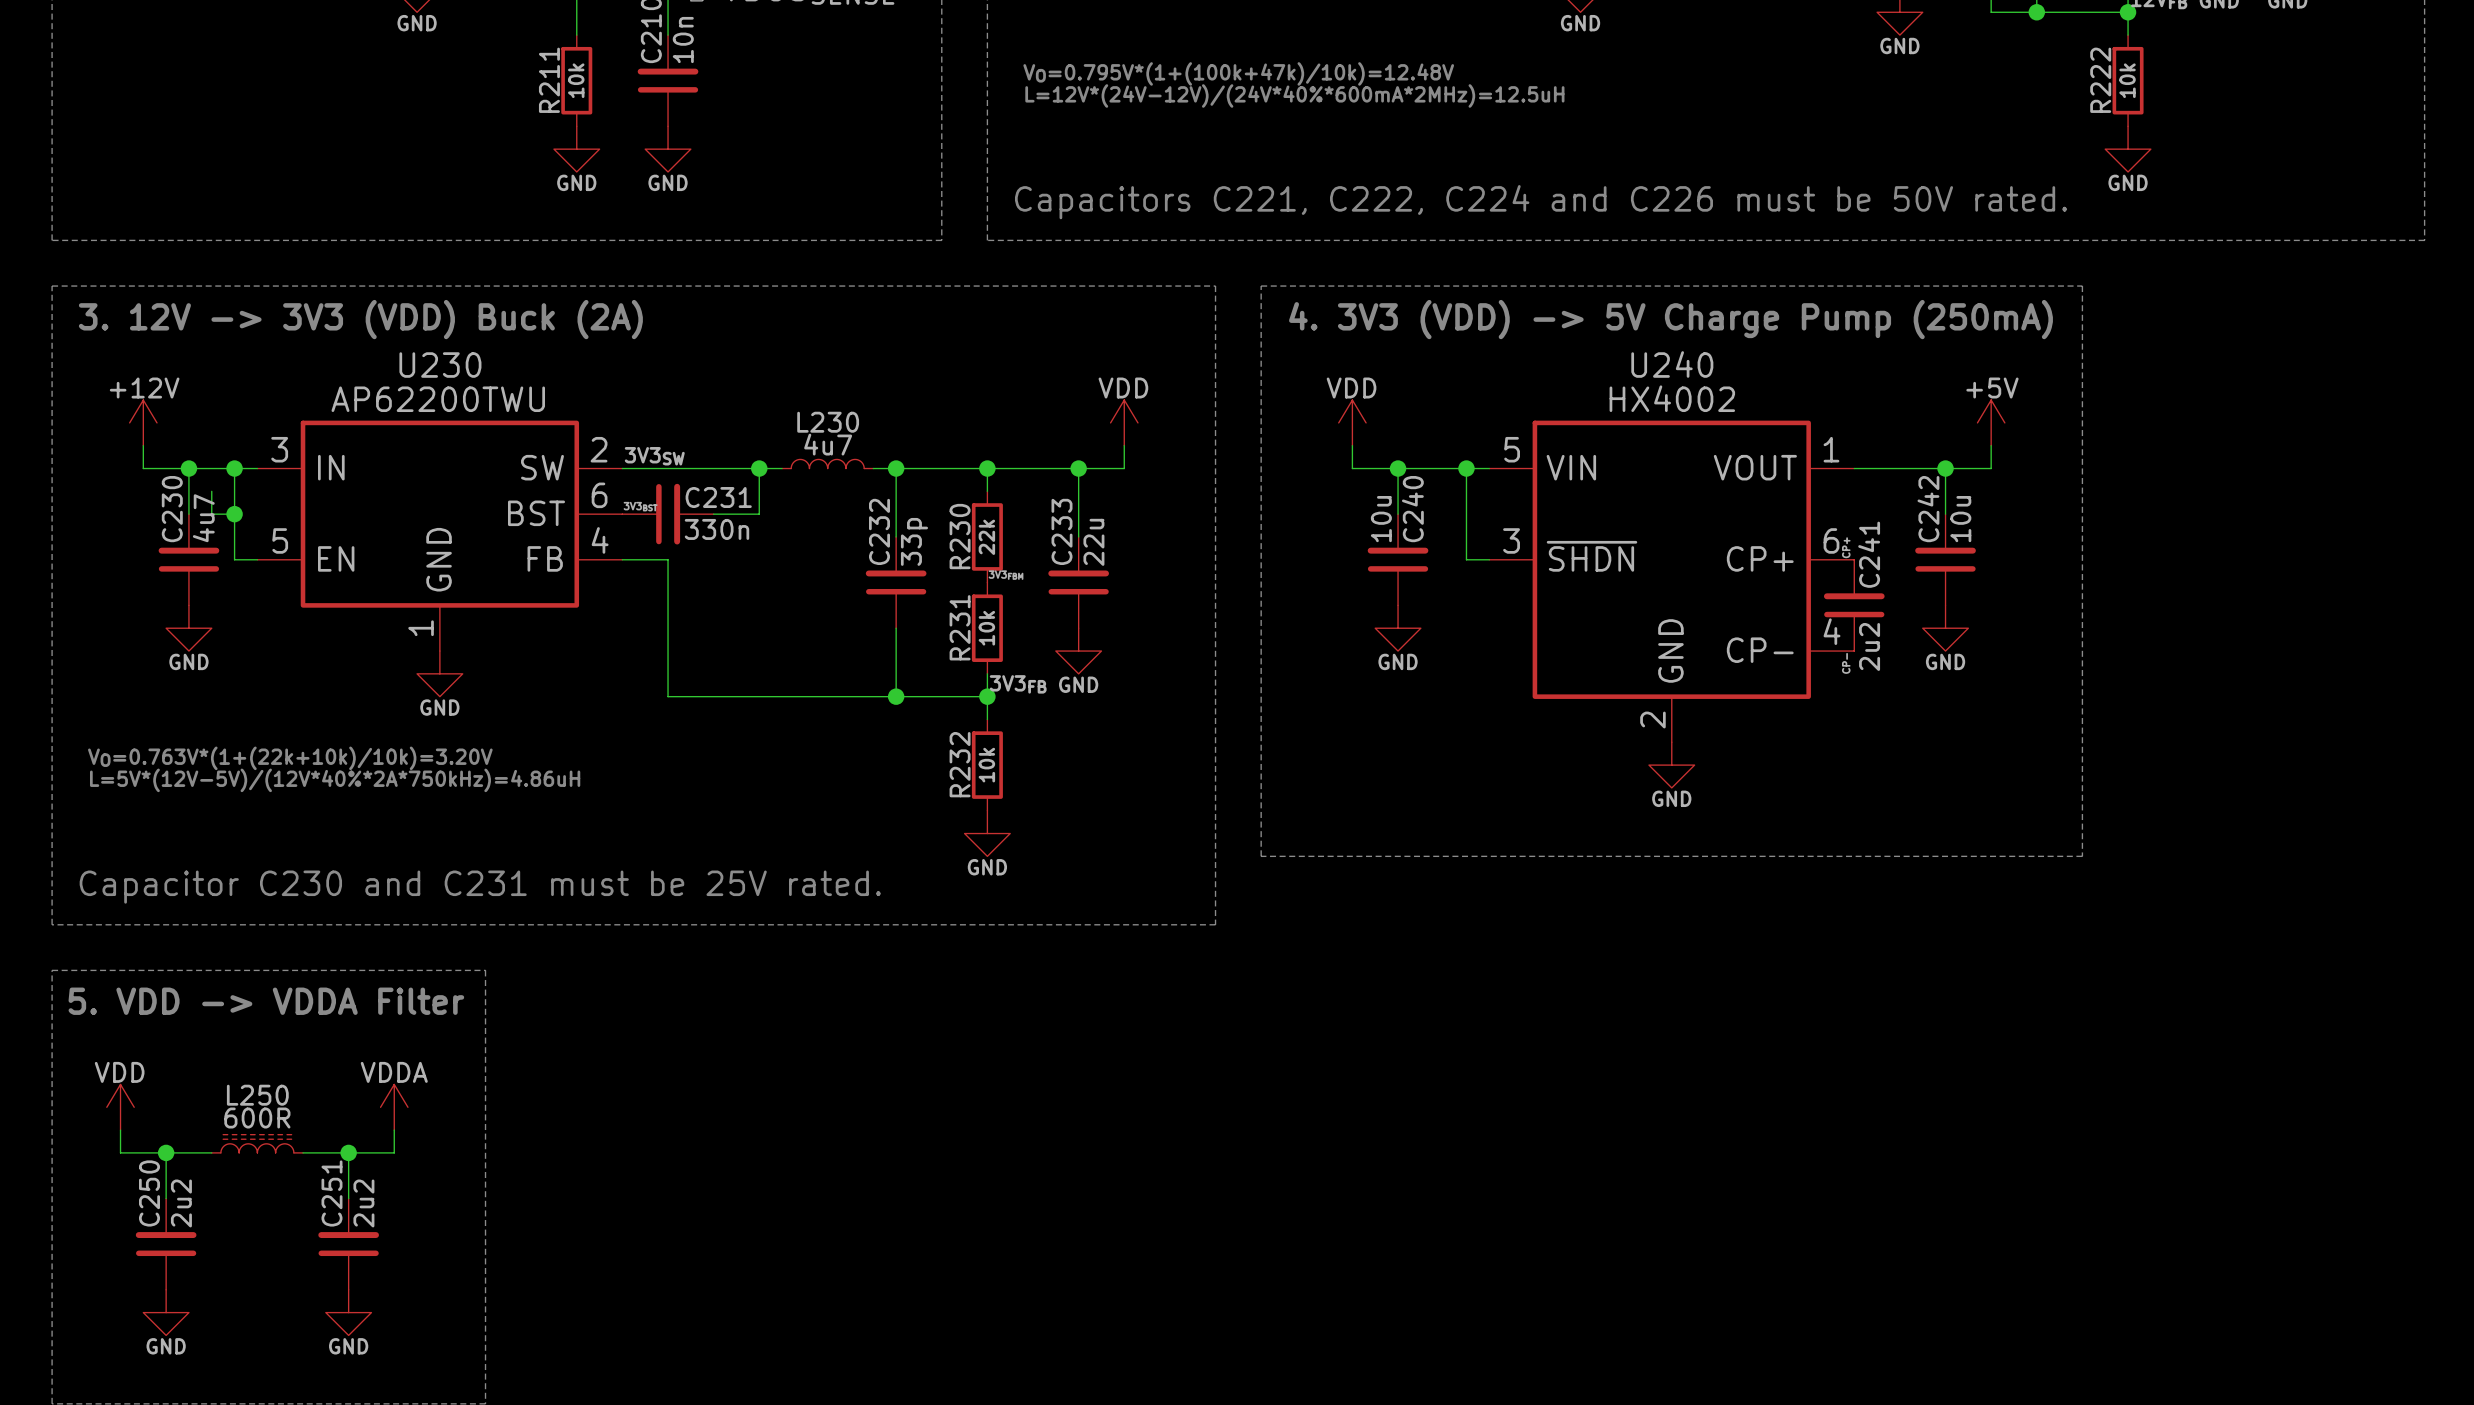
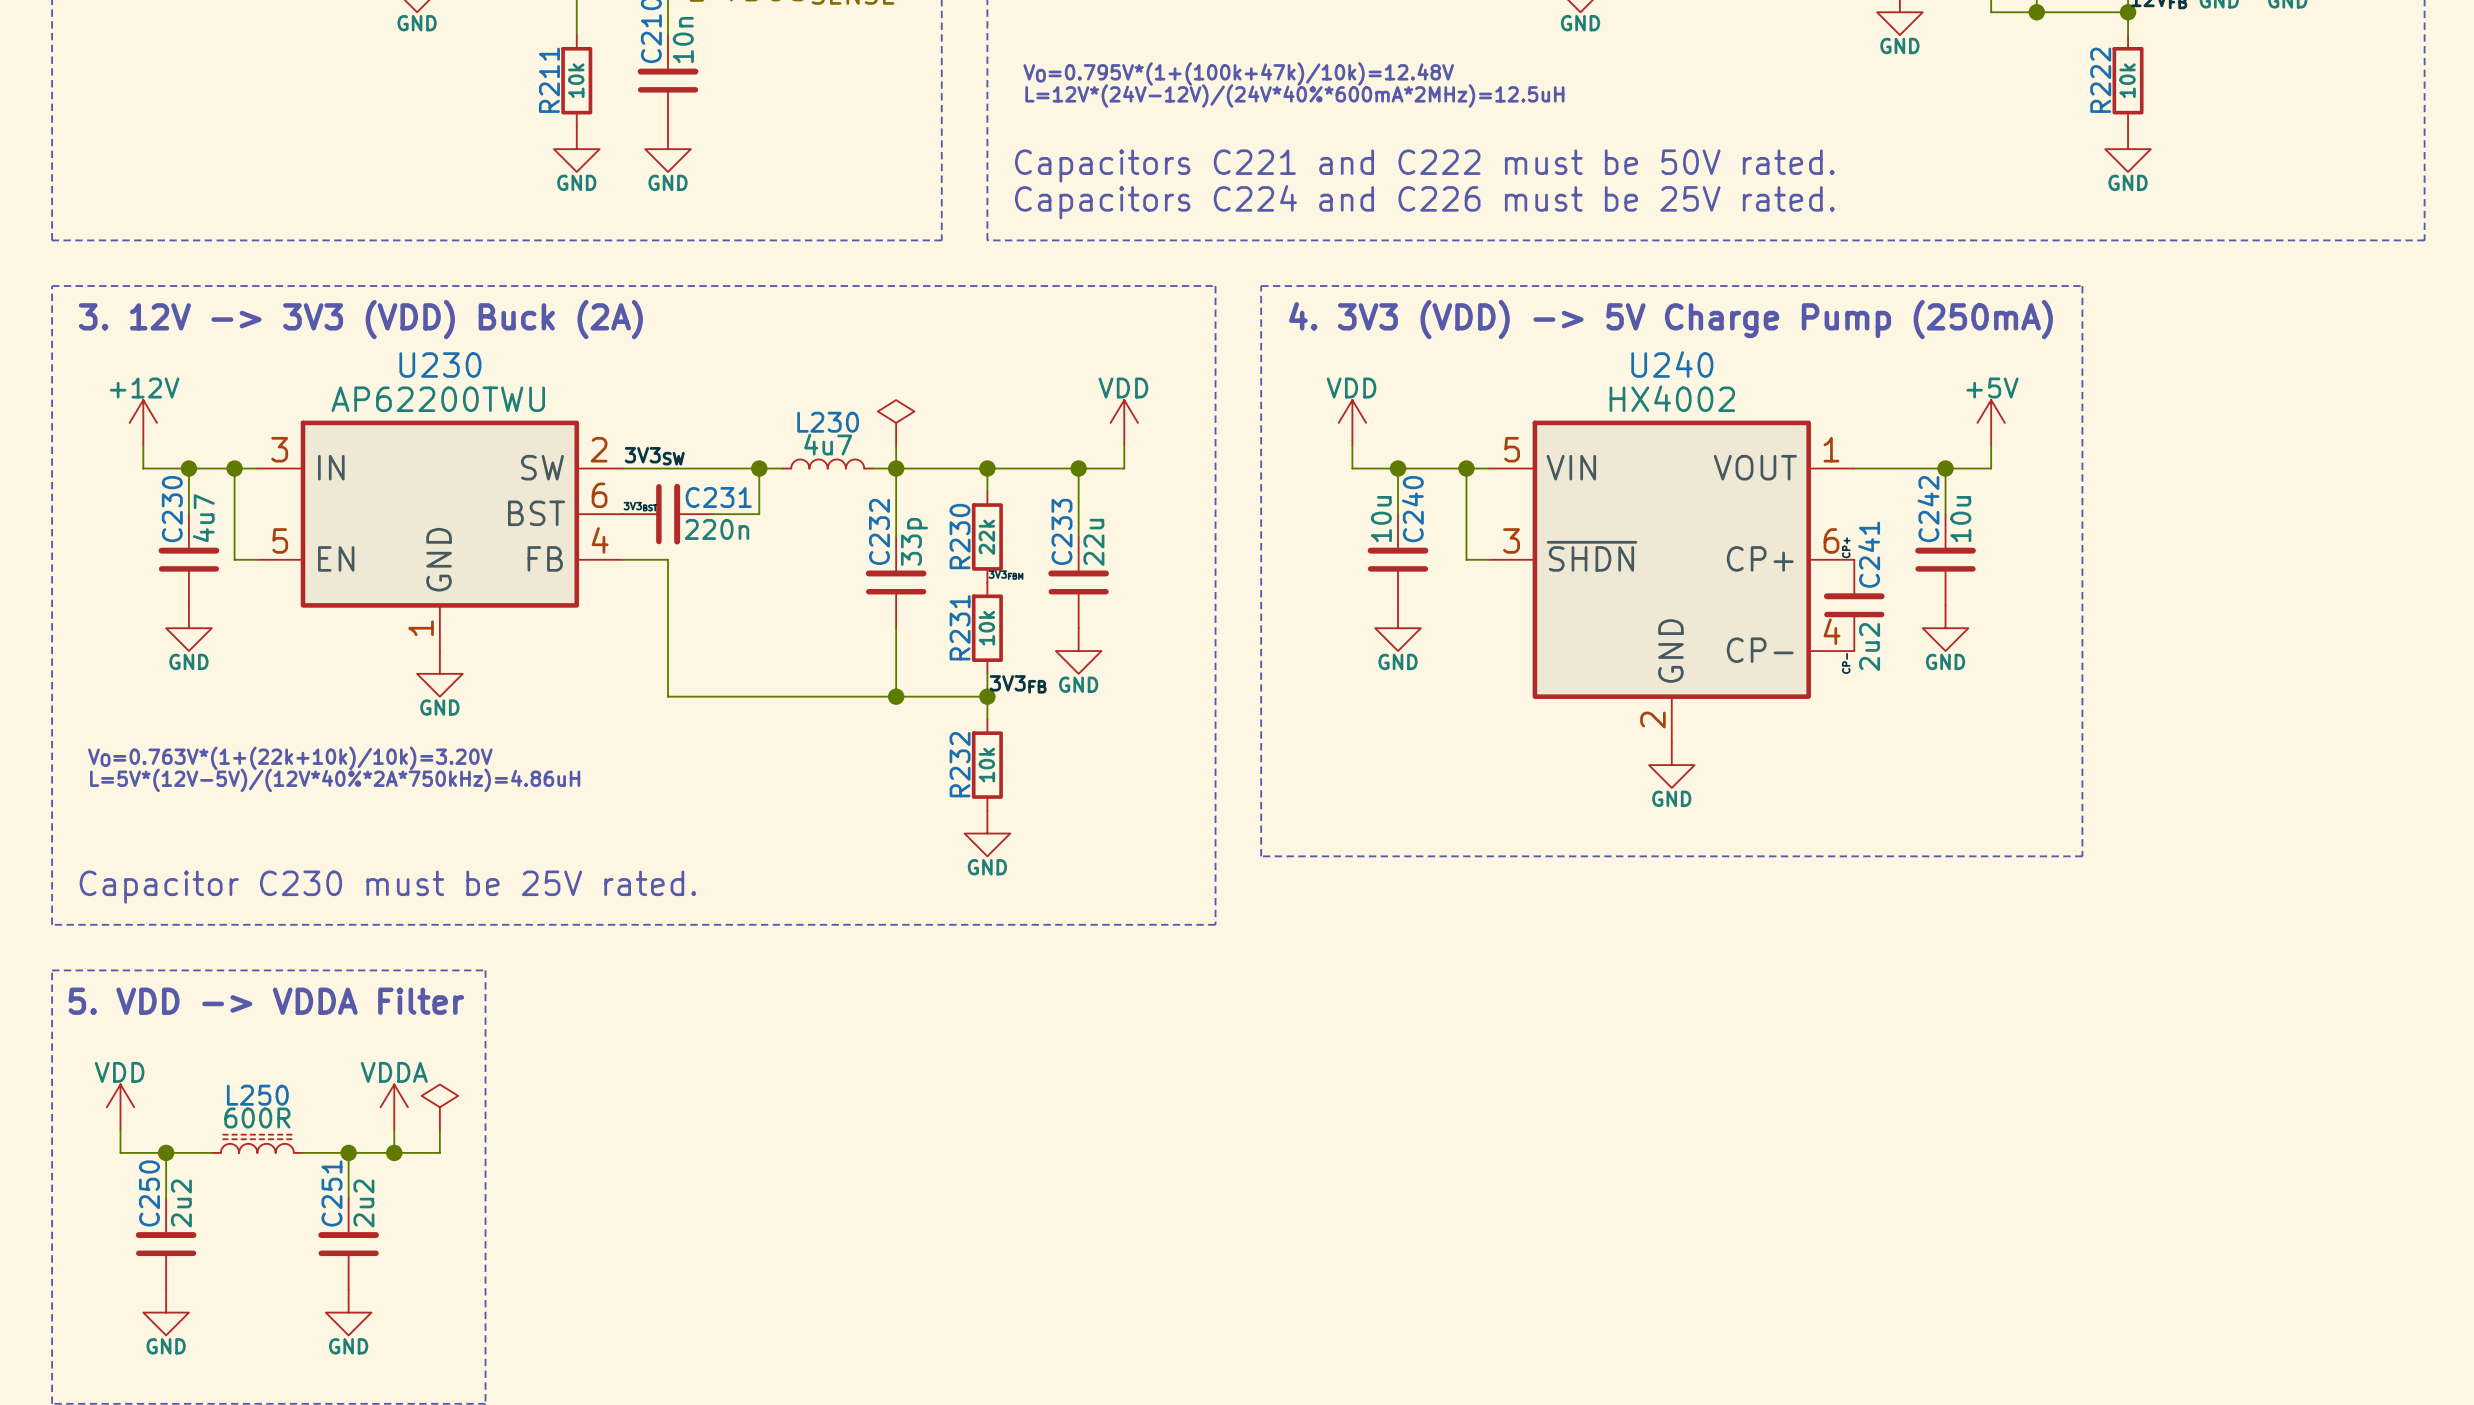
text: none -> Capacitors C221 and C222 must be 50V rated. (1424, 165)
text: Capacitors C221, C222, C224 and C226 must be 50V rated. (1541, 202) -> Capacitors C224 and C226 must be 25V rated. (1424, 202)
power symbol: none -> (896, 422)
wire: none -> (896, 445) (896, 468)
wire: (211, 491) (211, 514) (234, 514) -> none
junction: (234, 514) -> none
C231 value: 330n (716, 529) -> 220n (716, 529)
text: Capacitor C230 and C231 must be 25V rated. (480, 887) -> Capacitor C230 must be 25V rated. (387, 887)
power symbol: none -> (439, 1107)
wire: none -> (439, 1130) (439, 1152) (394, 1152)
junction: none -> (394, 1152)

